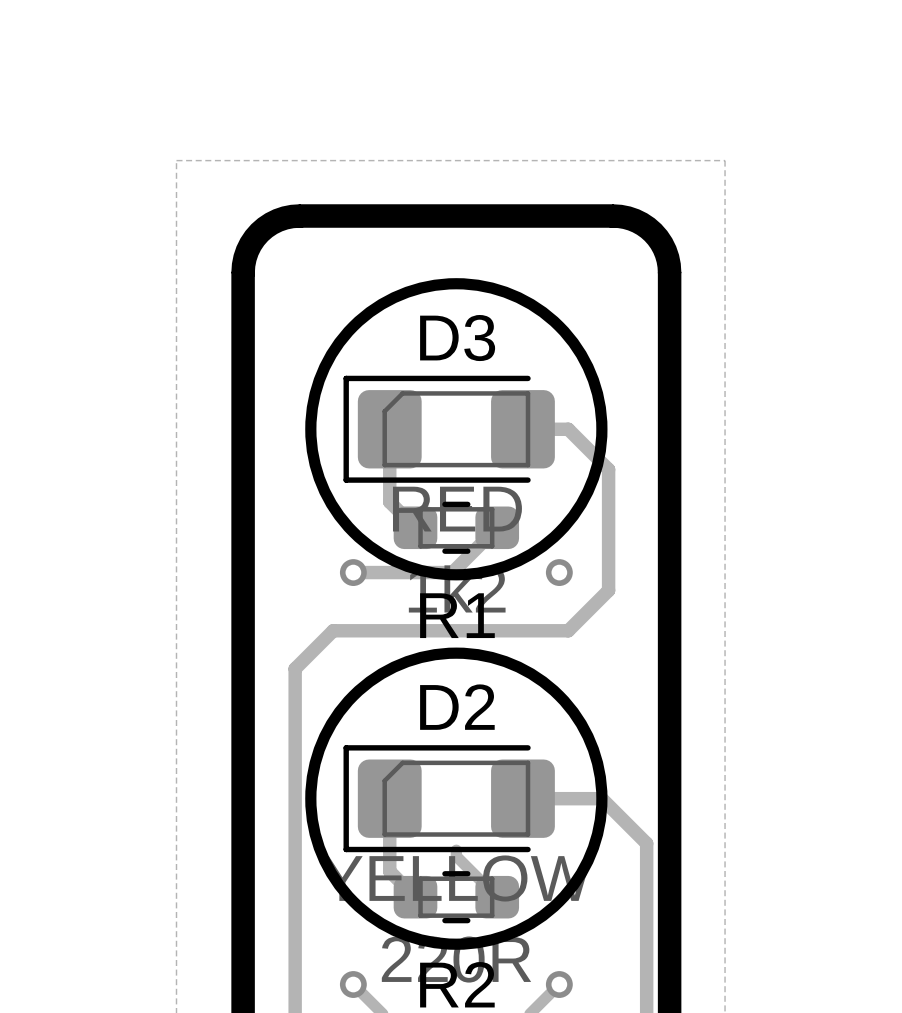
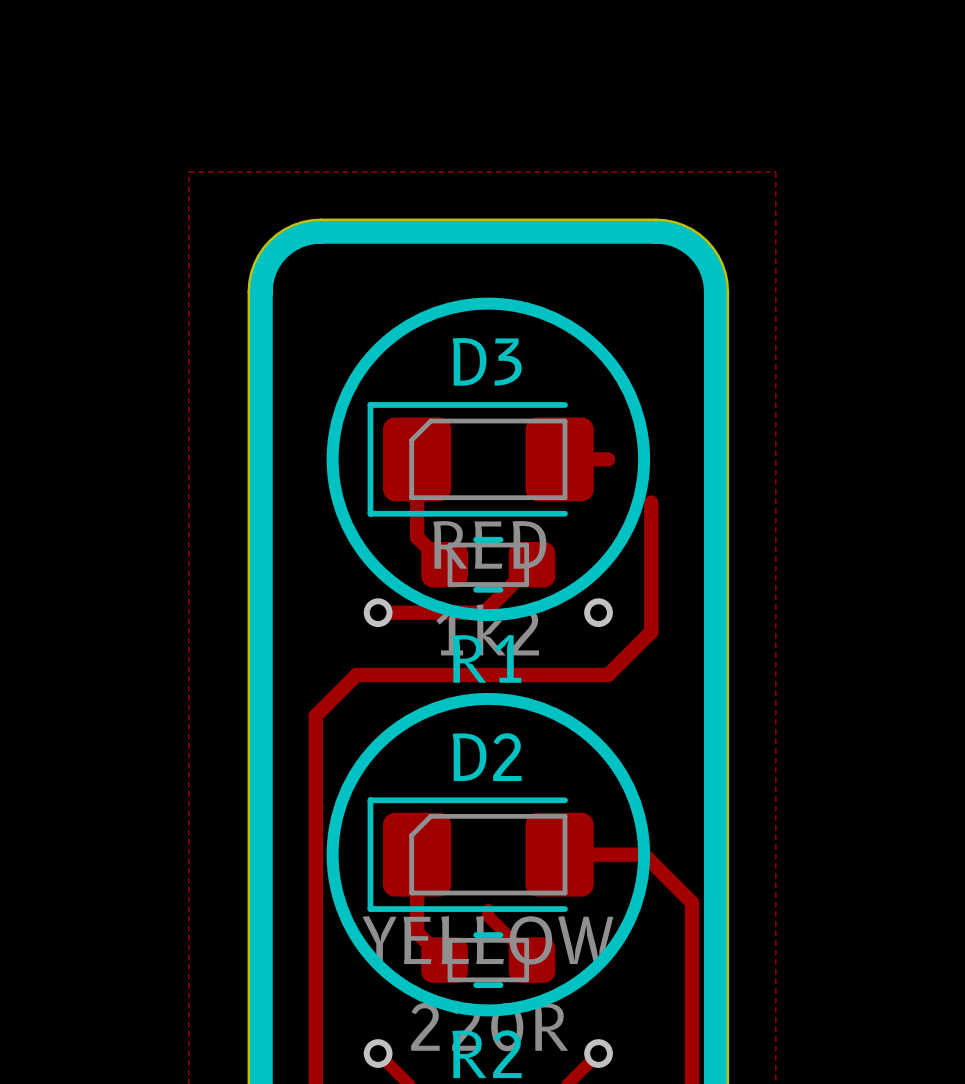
track: (568, 429) (608, 469) -> none

